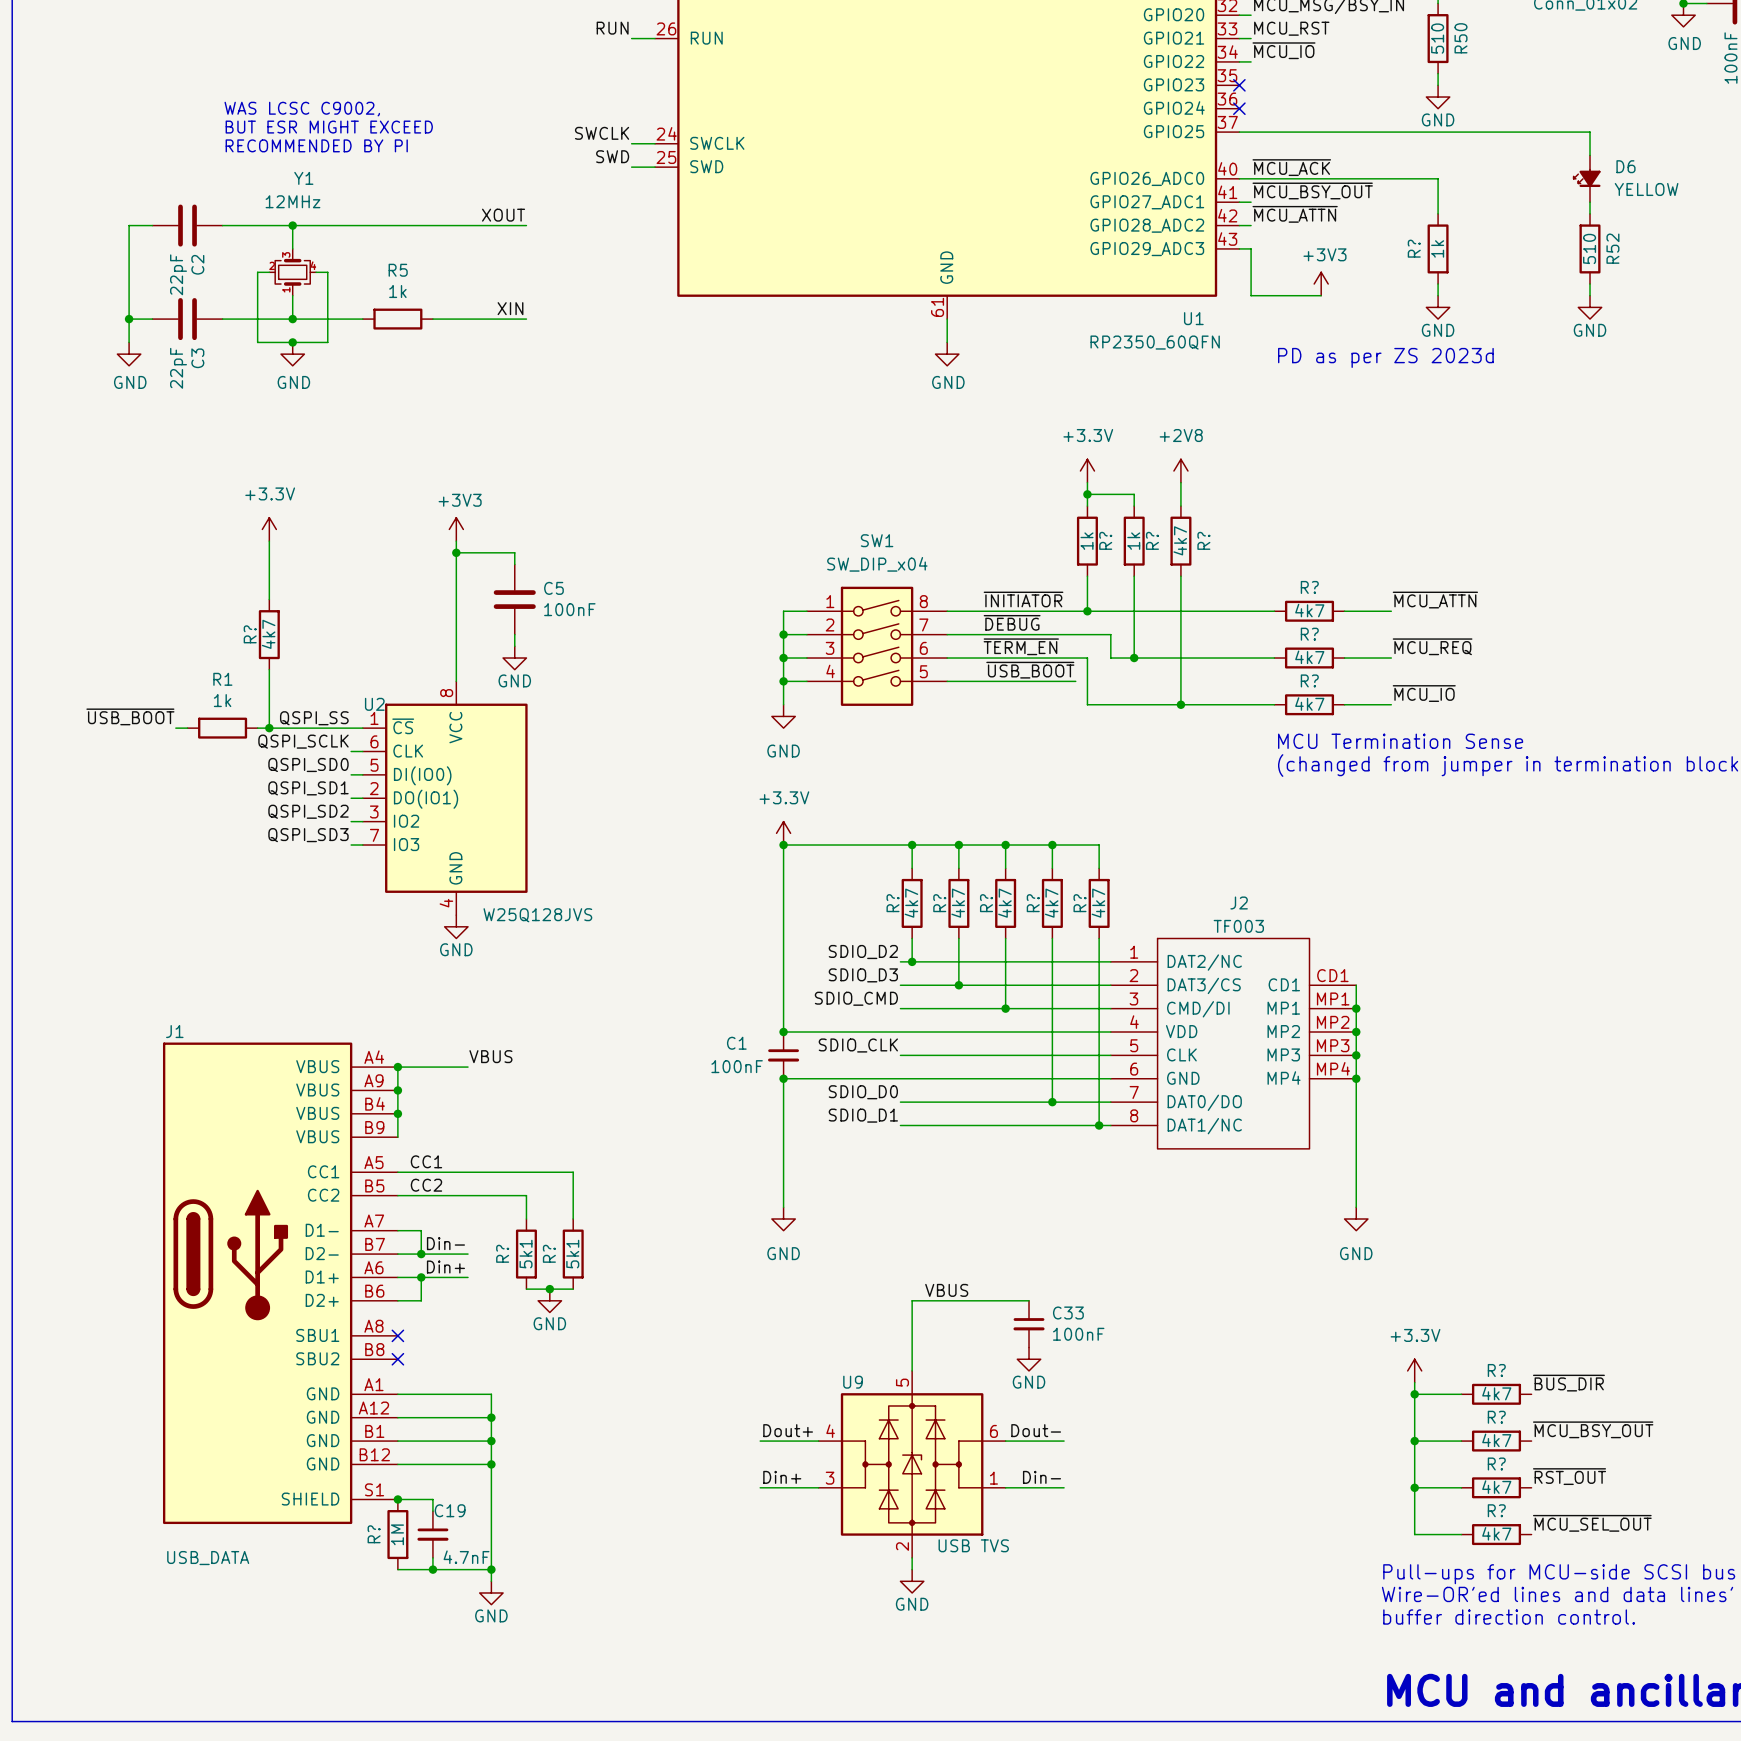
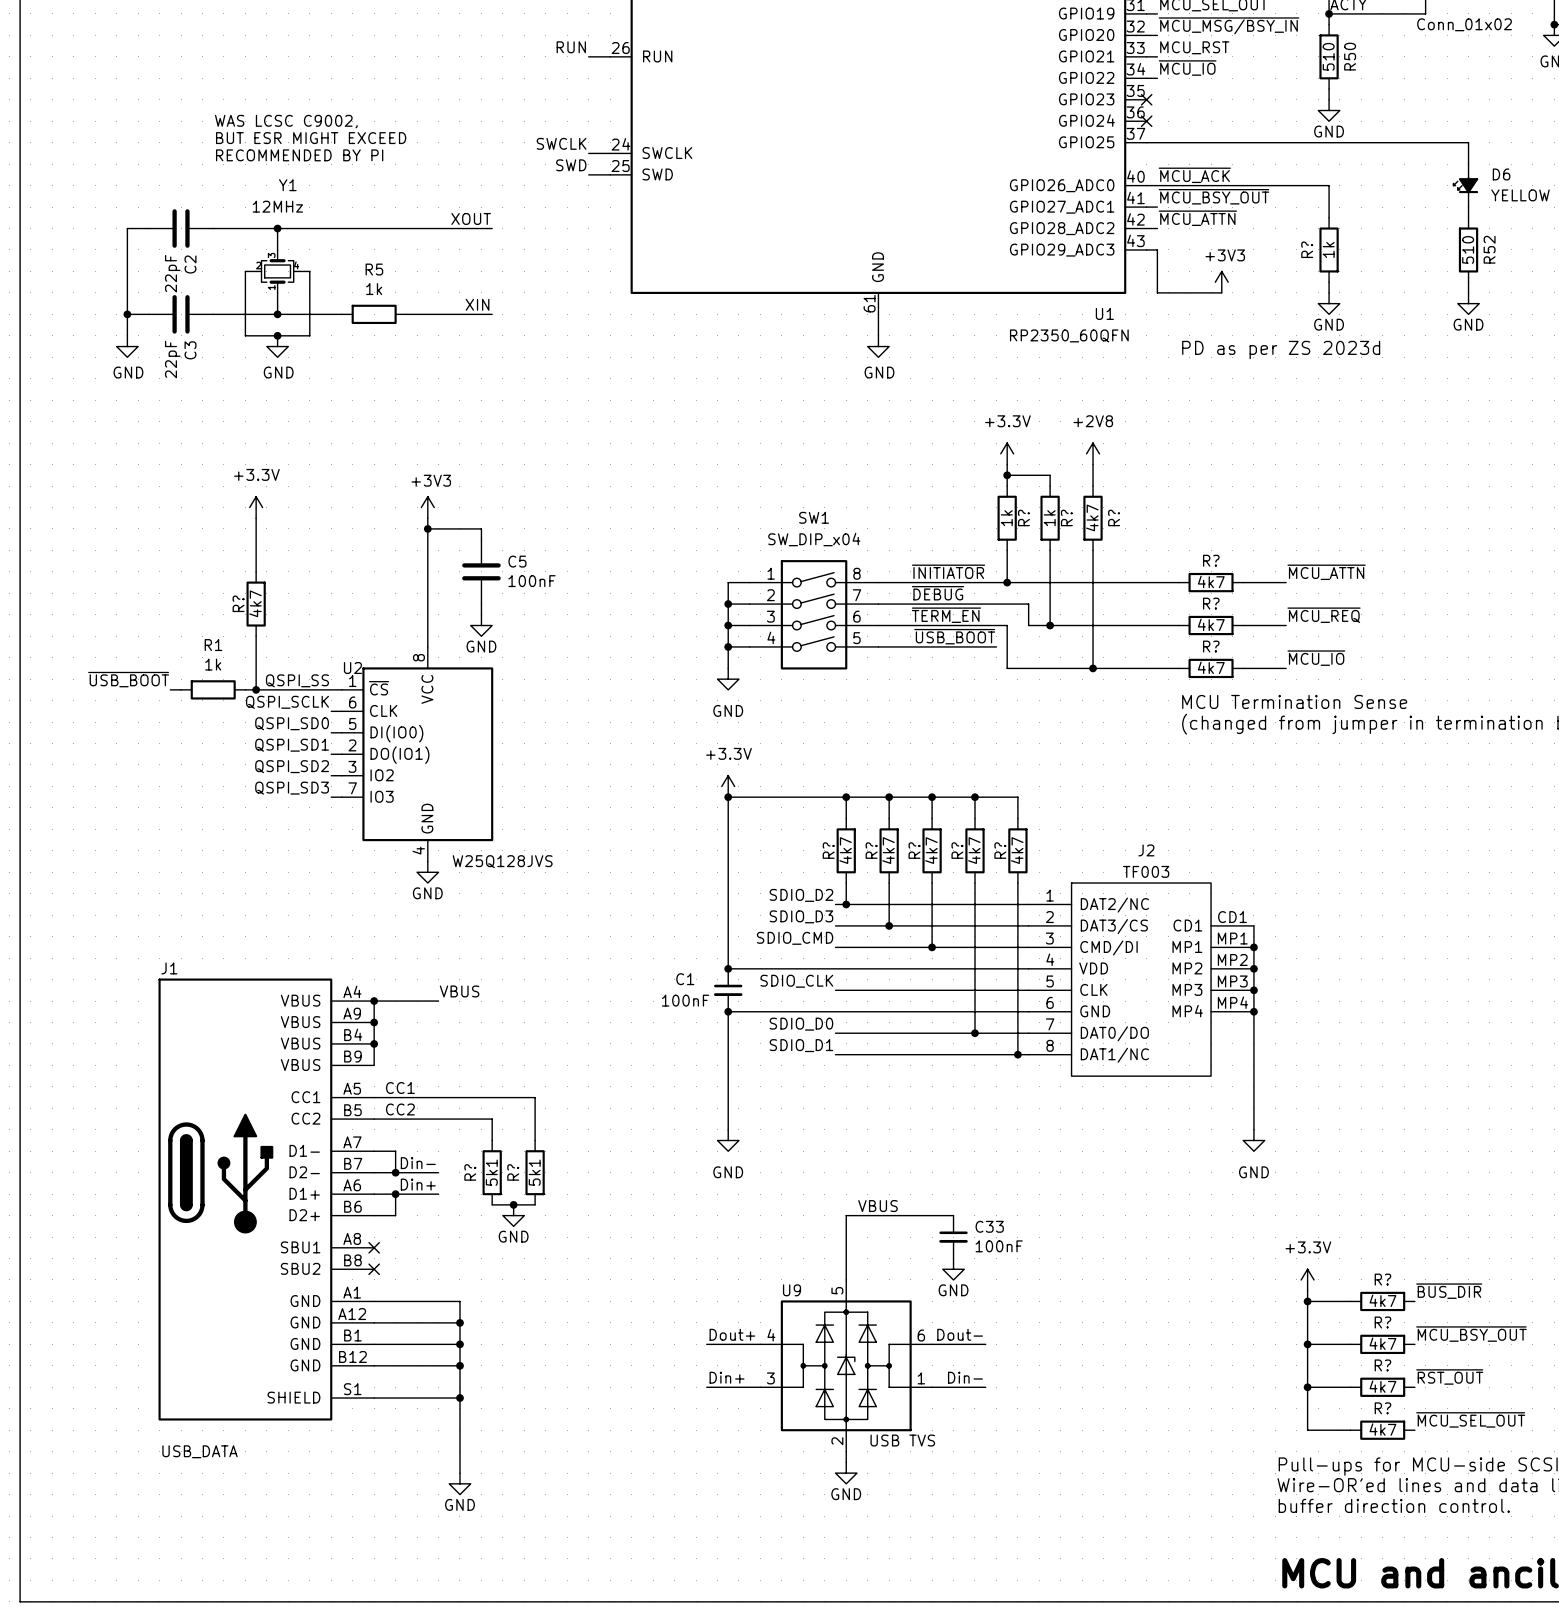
junction: (397, 1499) -> none
wire: (432, 1499) (432, 1511) -> (406, 1398) (459, 1398)
junction: none -> (459, 1398)
R?: 1M (397, 1534) -> none
C19: 4.7nF (432, 1534) -> none
wire: (432, 1557) (432, 1569) -> none
wire: (397, 1569) (491, 1569) -> none
junction: (432, 1569) -> none
junction: (491, 1569) -> none

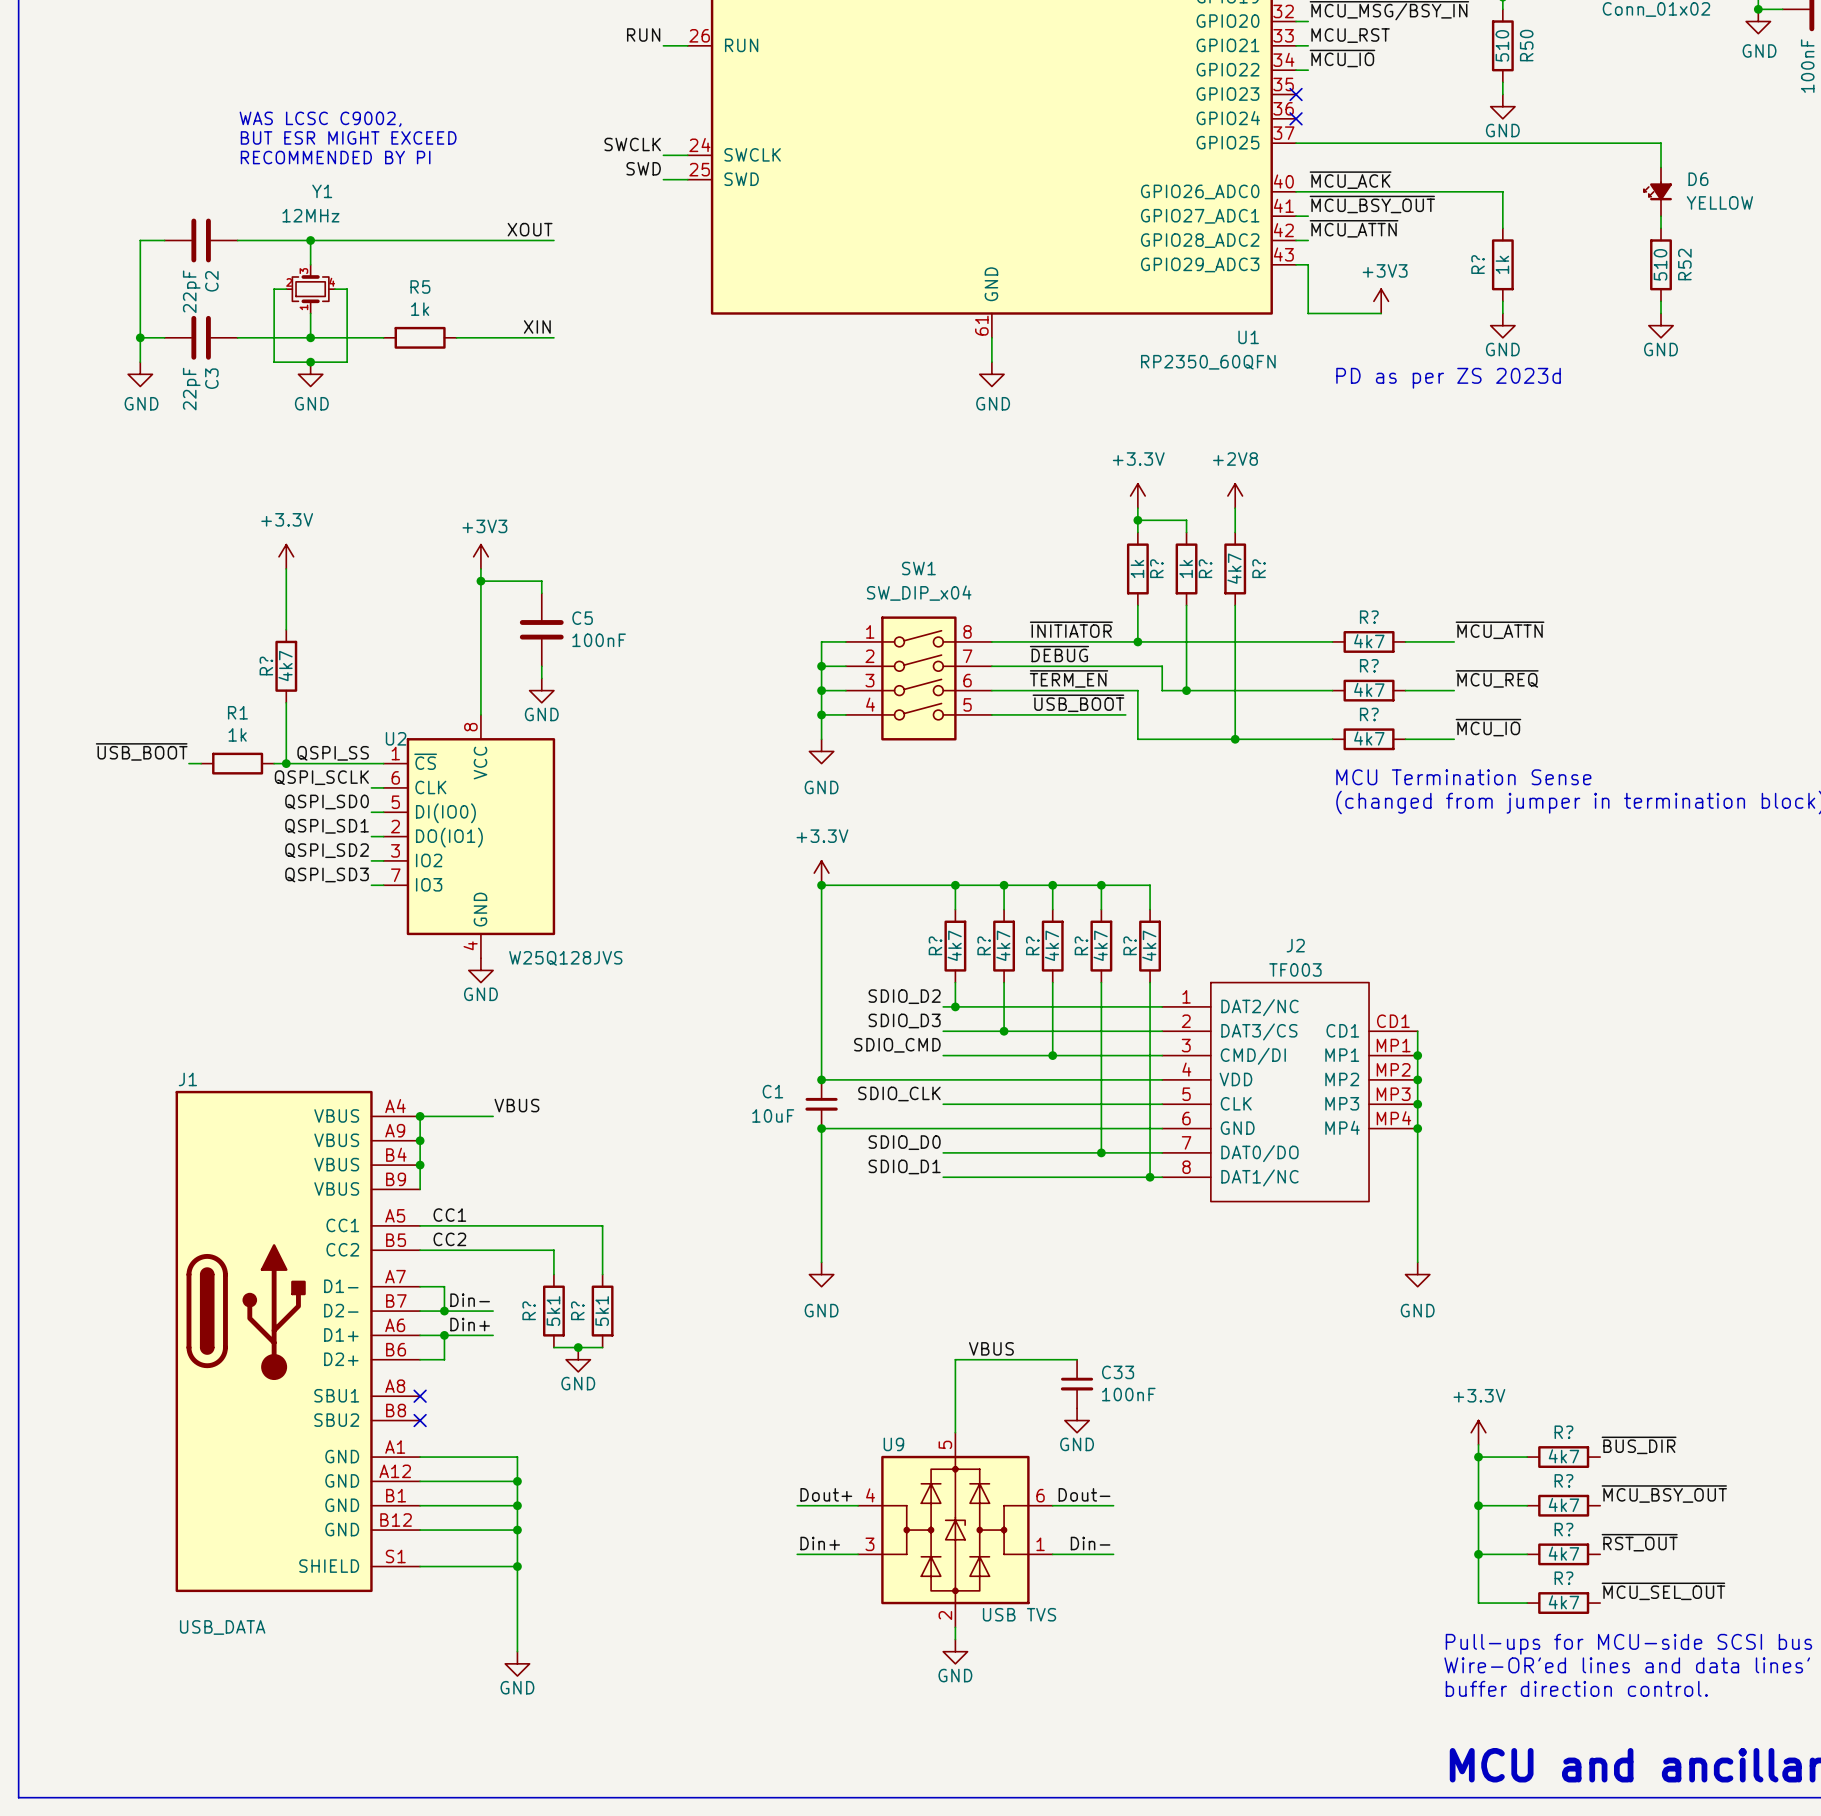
C1 value: 100nF (685, 1000) -> 10uF (773, 1115)

